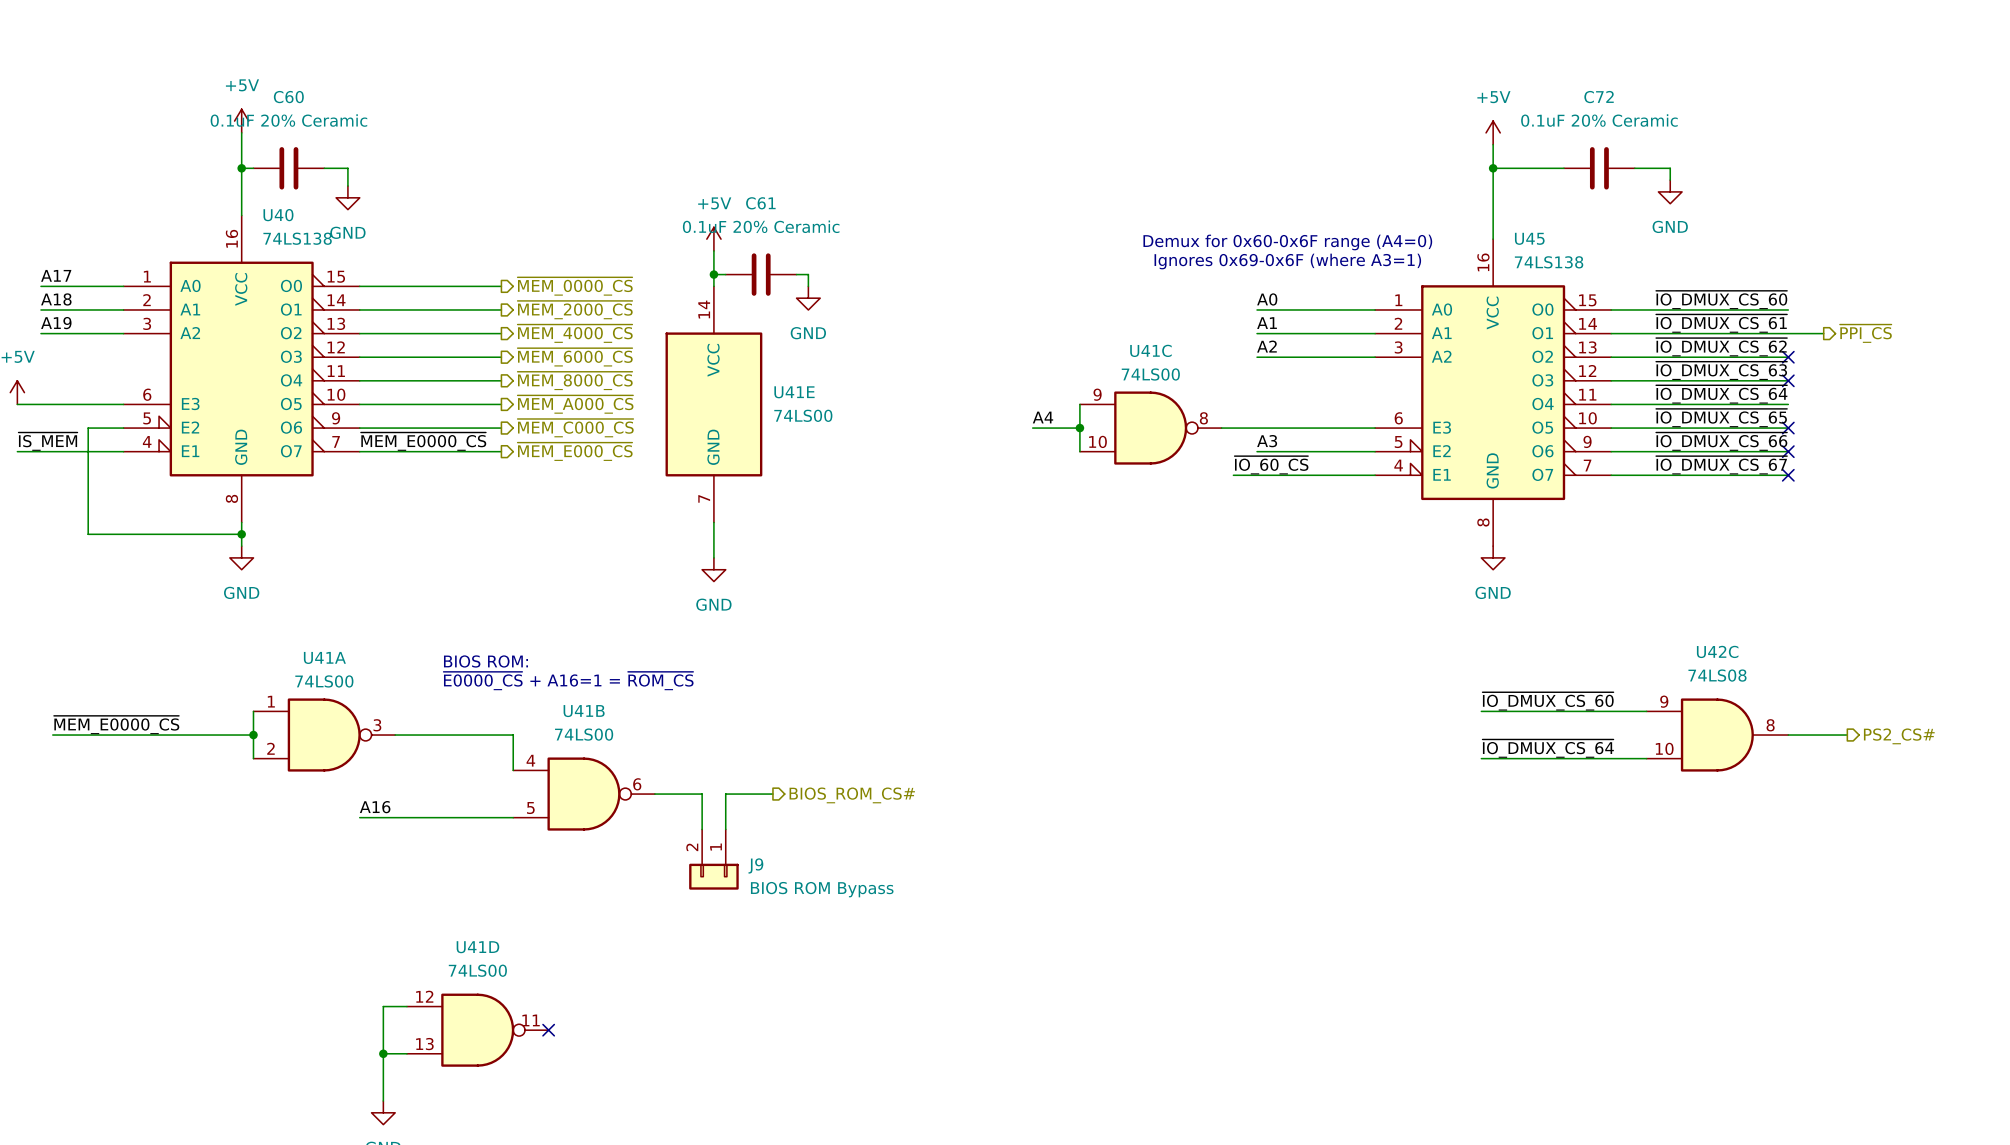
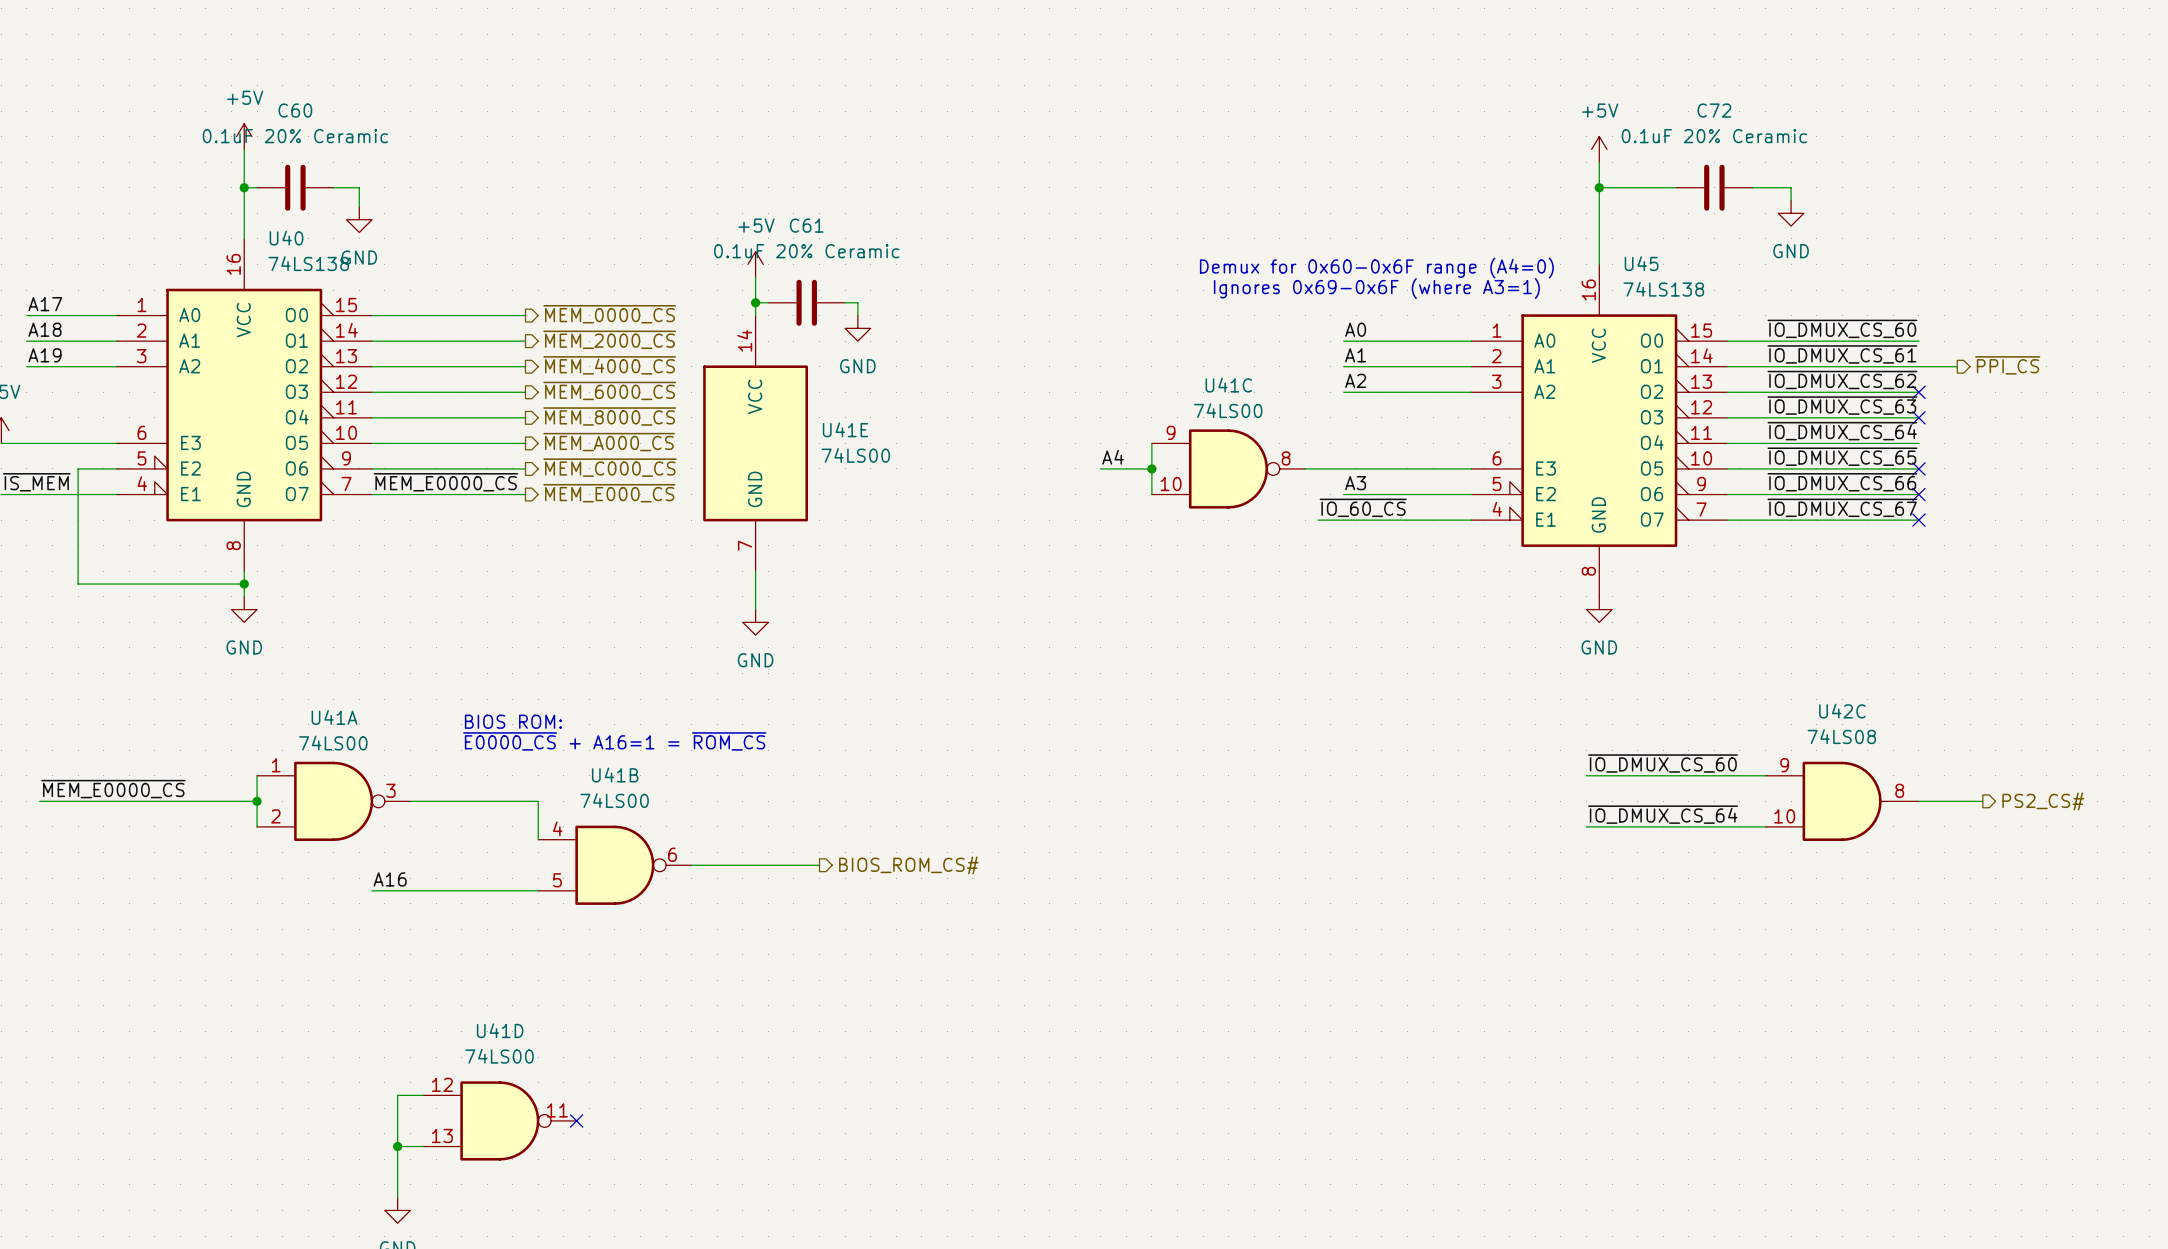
wire: (702, 794) (702, 829) -> (742, 865) (768, 865)
wire: (725, 794) (725, 829) -> none
J9: BIOS ROM Bypass (713, 859) -> none

